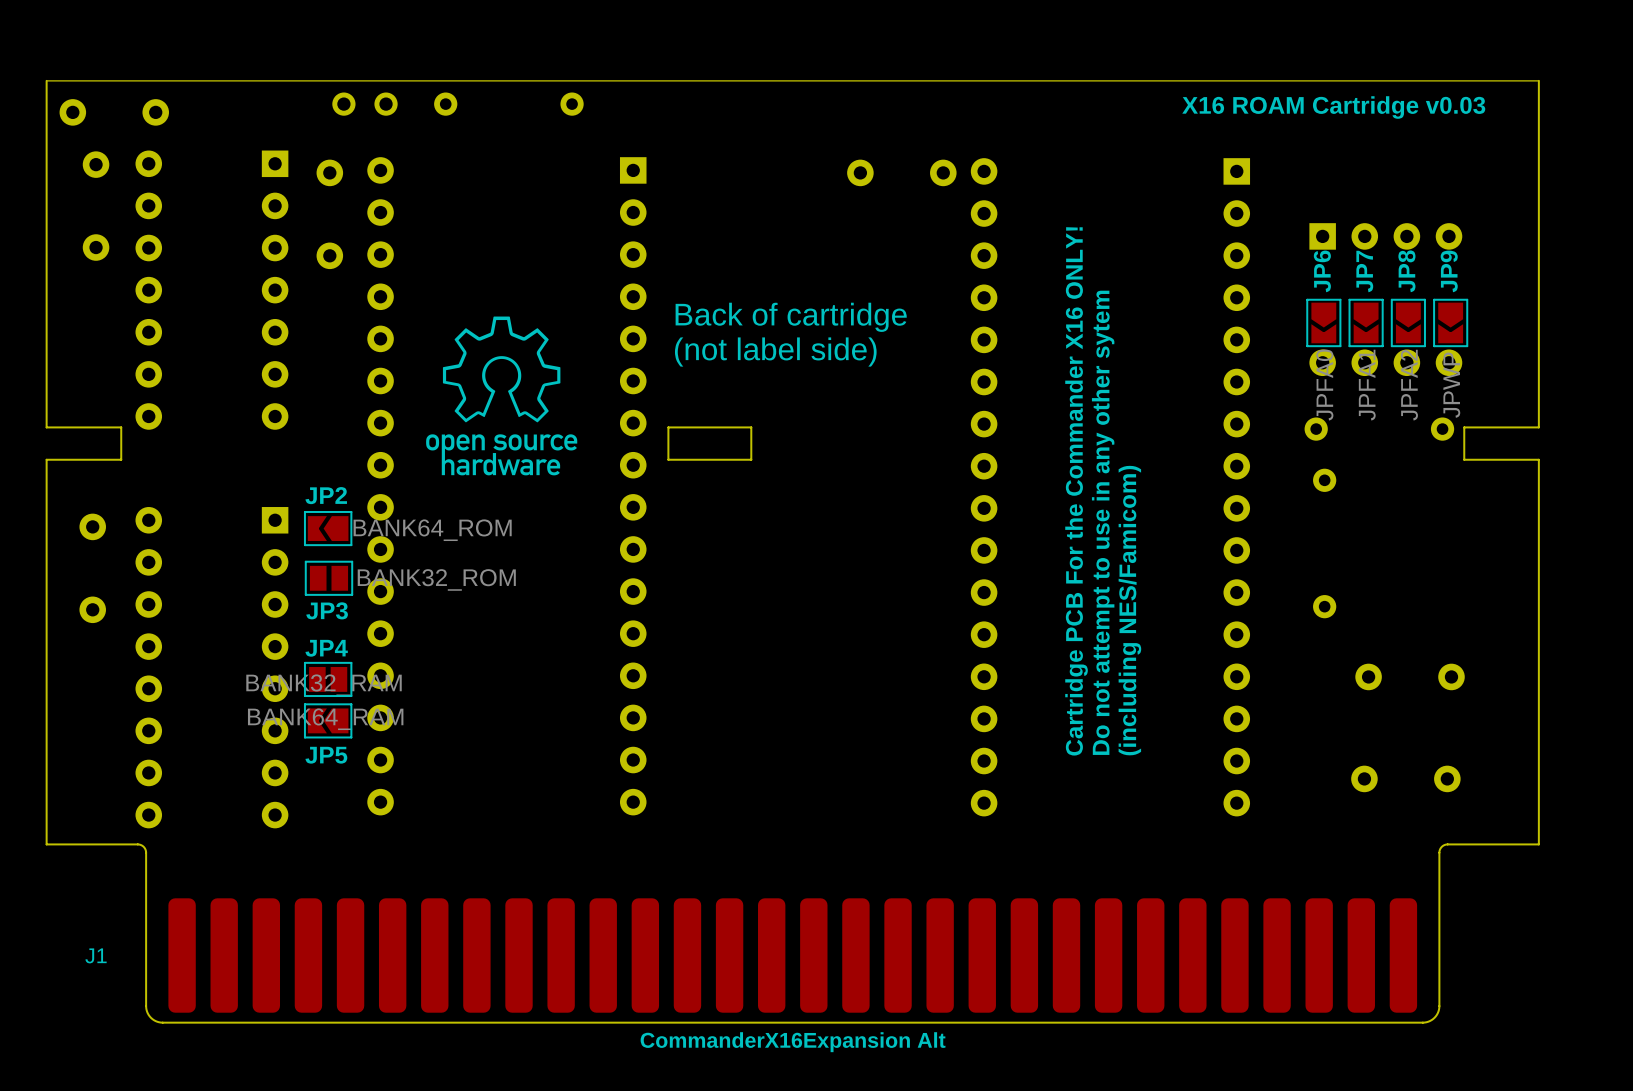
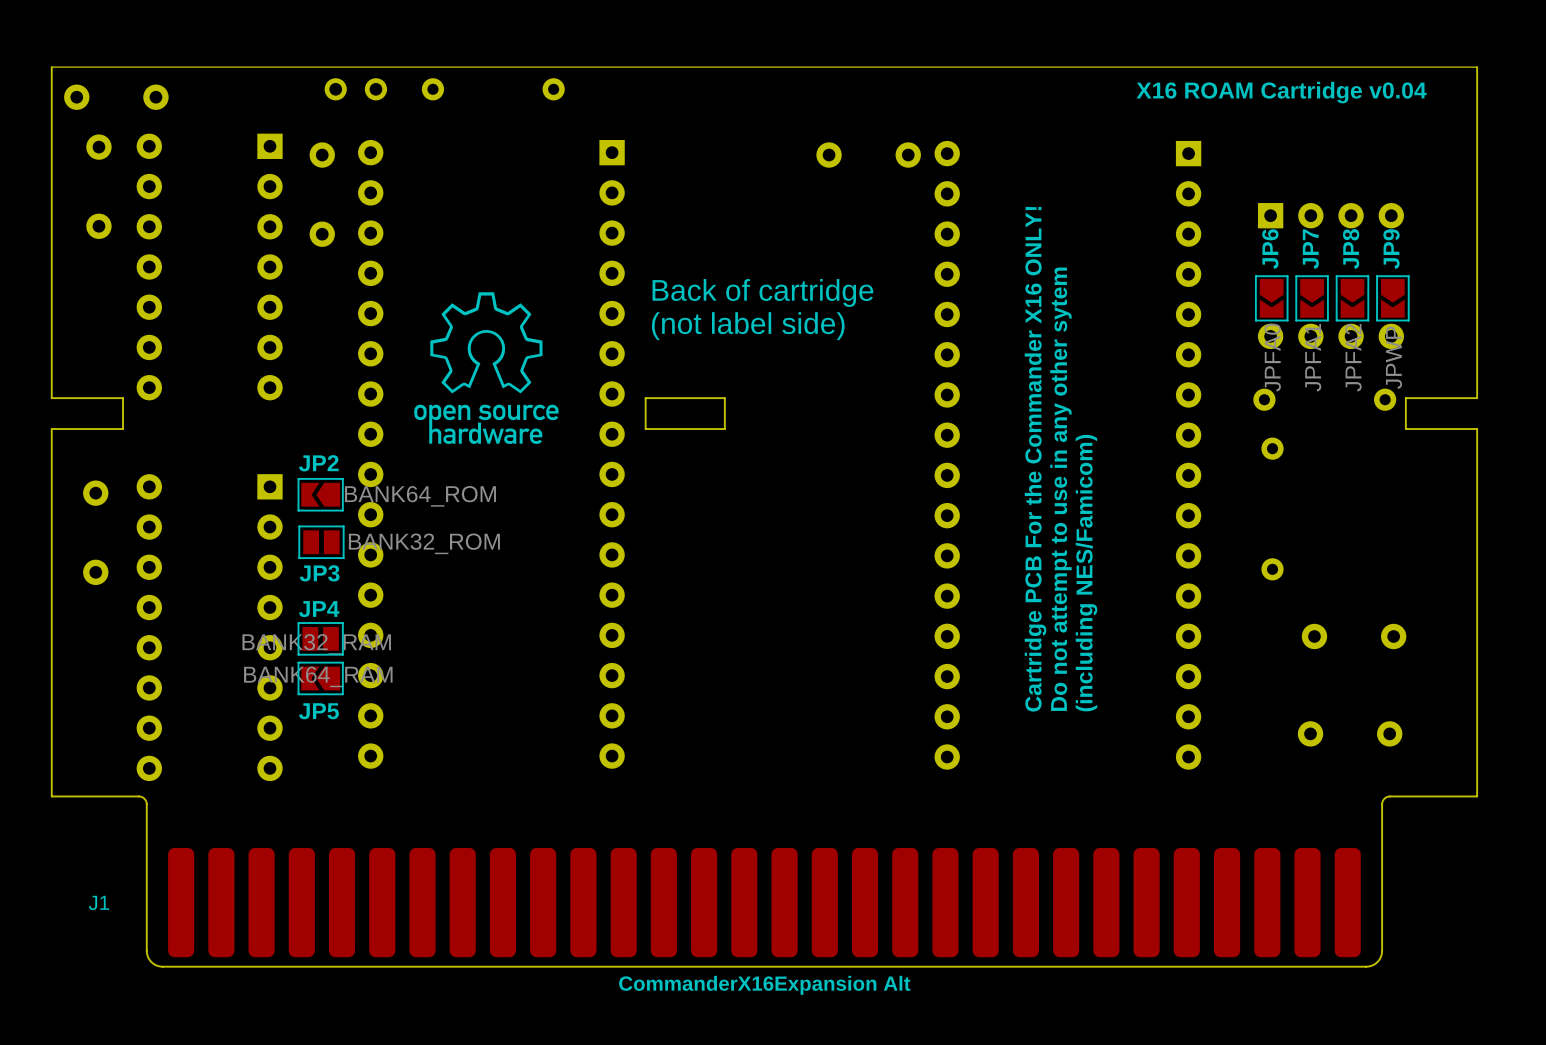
text: X16 ROAM Cartridge v0.03 (1333, 107) -> X16 ROAM Cartridge v0.04 (1281, 92)

